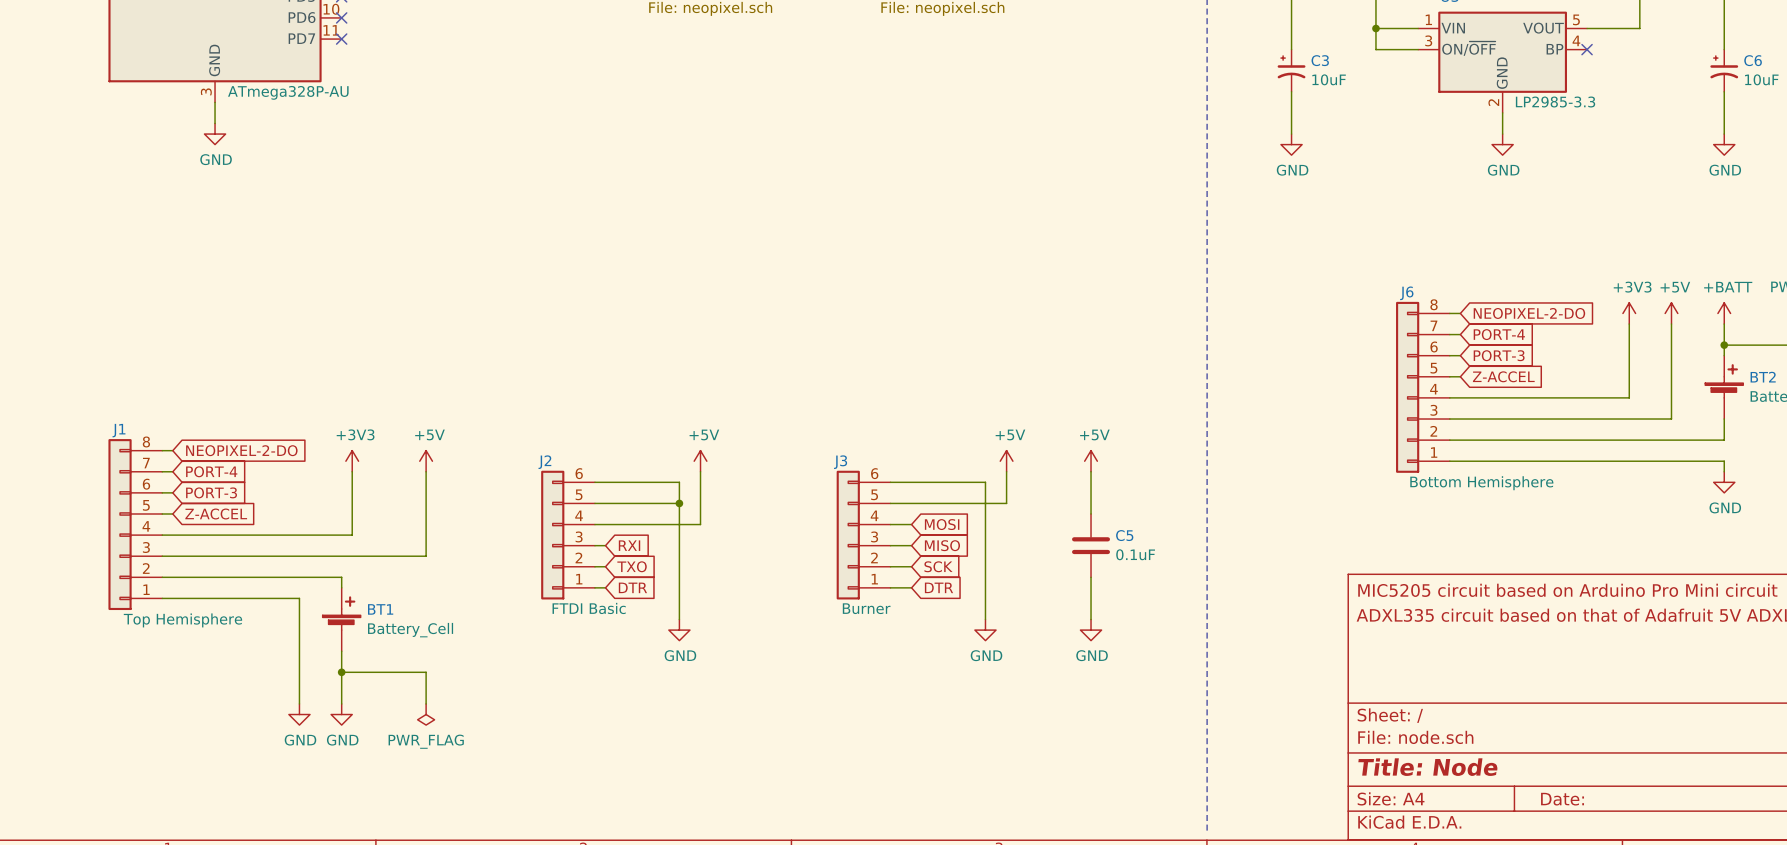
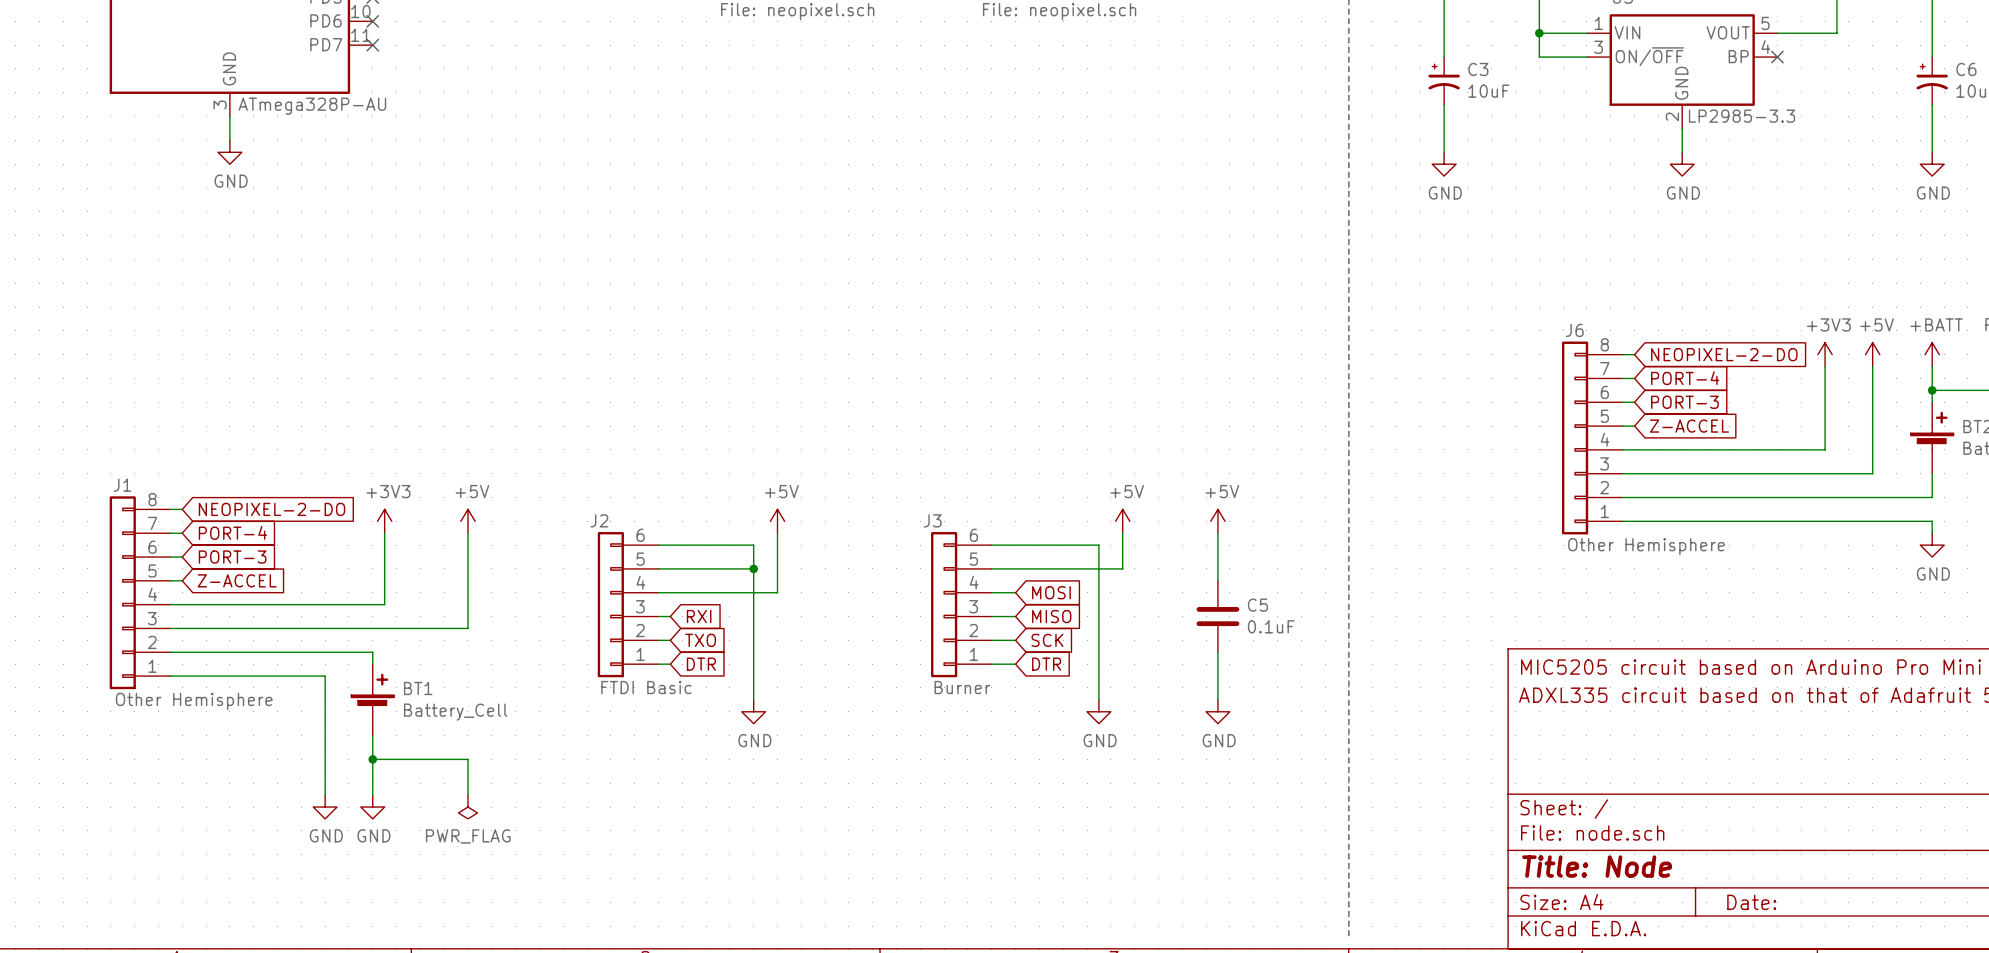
J6 value: Bottom Hemisphere (1481, 483) -> Other Hemisphere (1646, 546)
J1 value: Top Hemisphere (182, 620) -> Other Hemisphere (194, 701)

